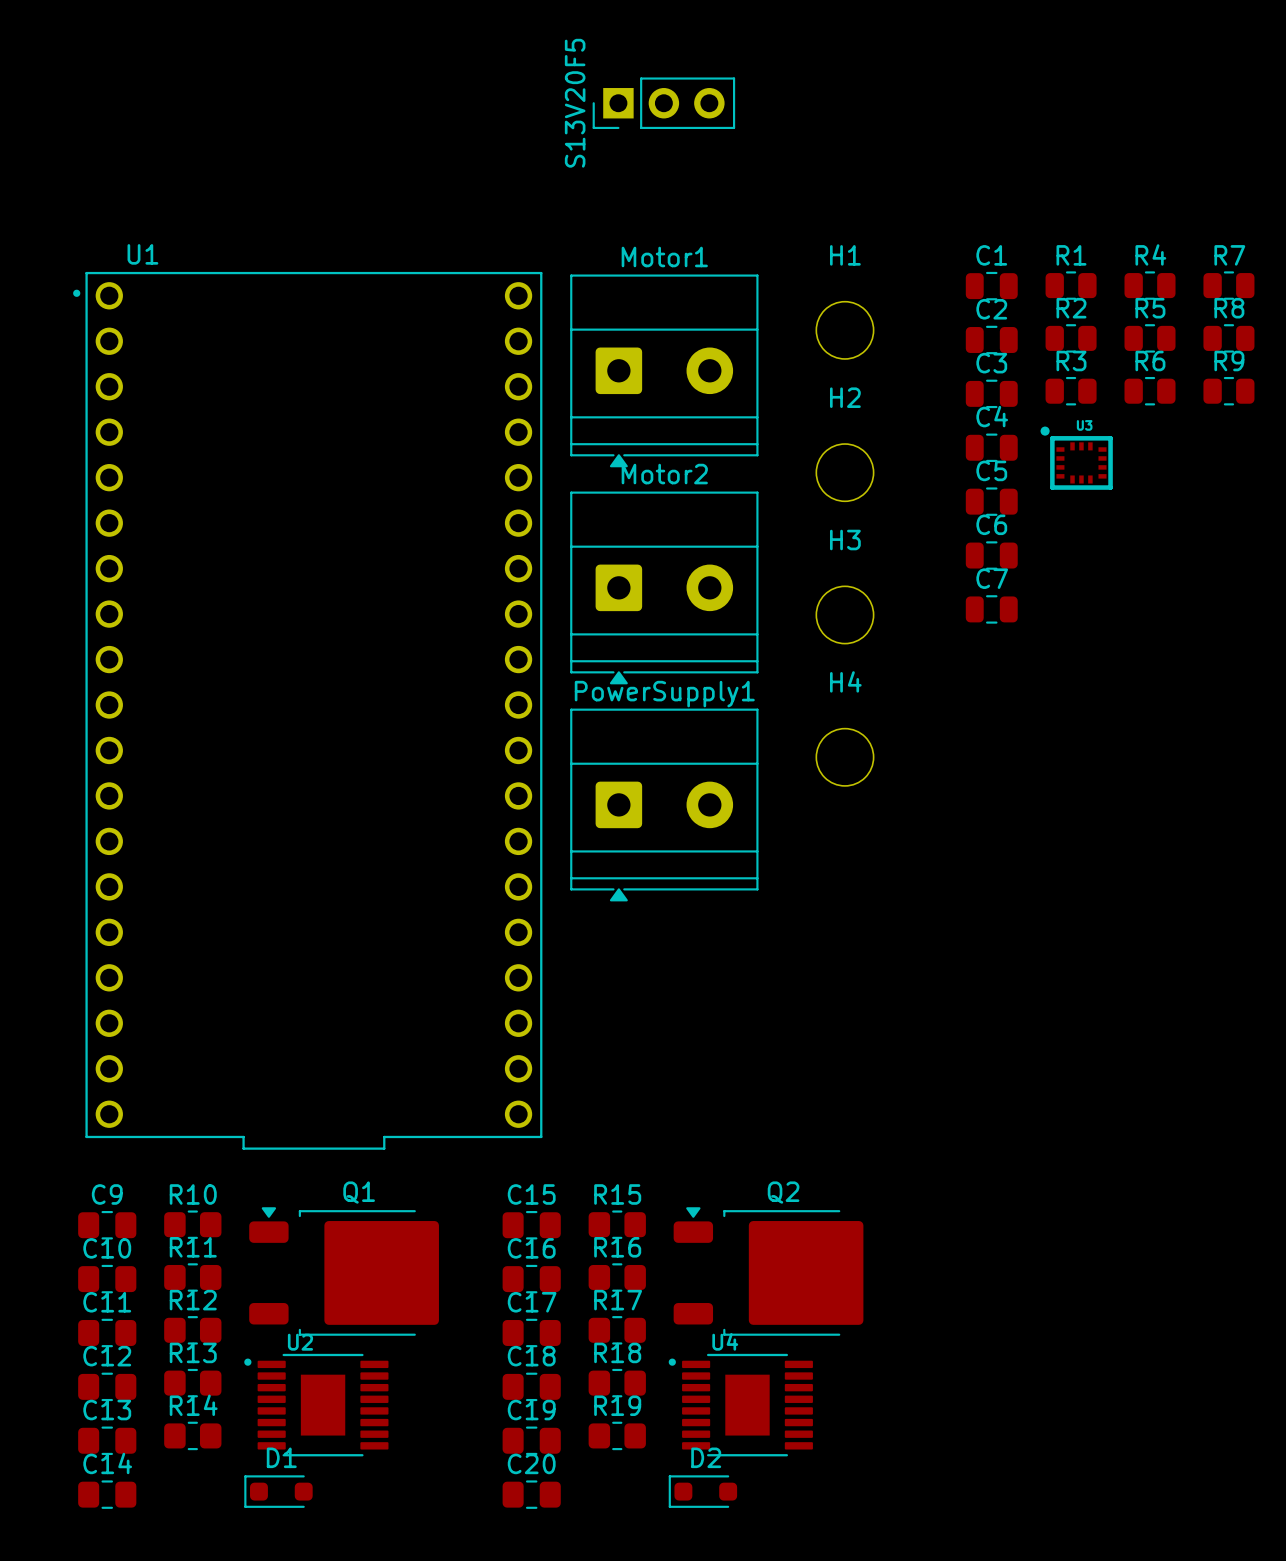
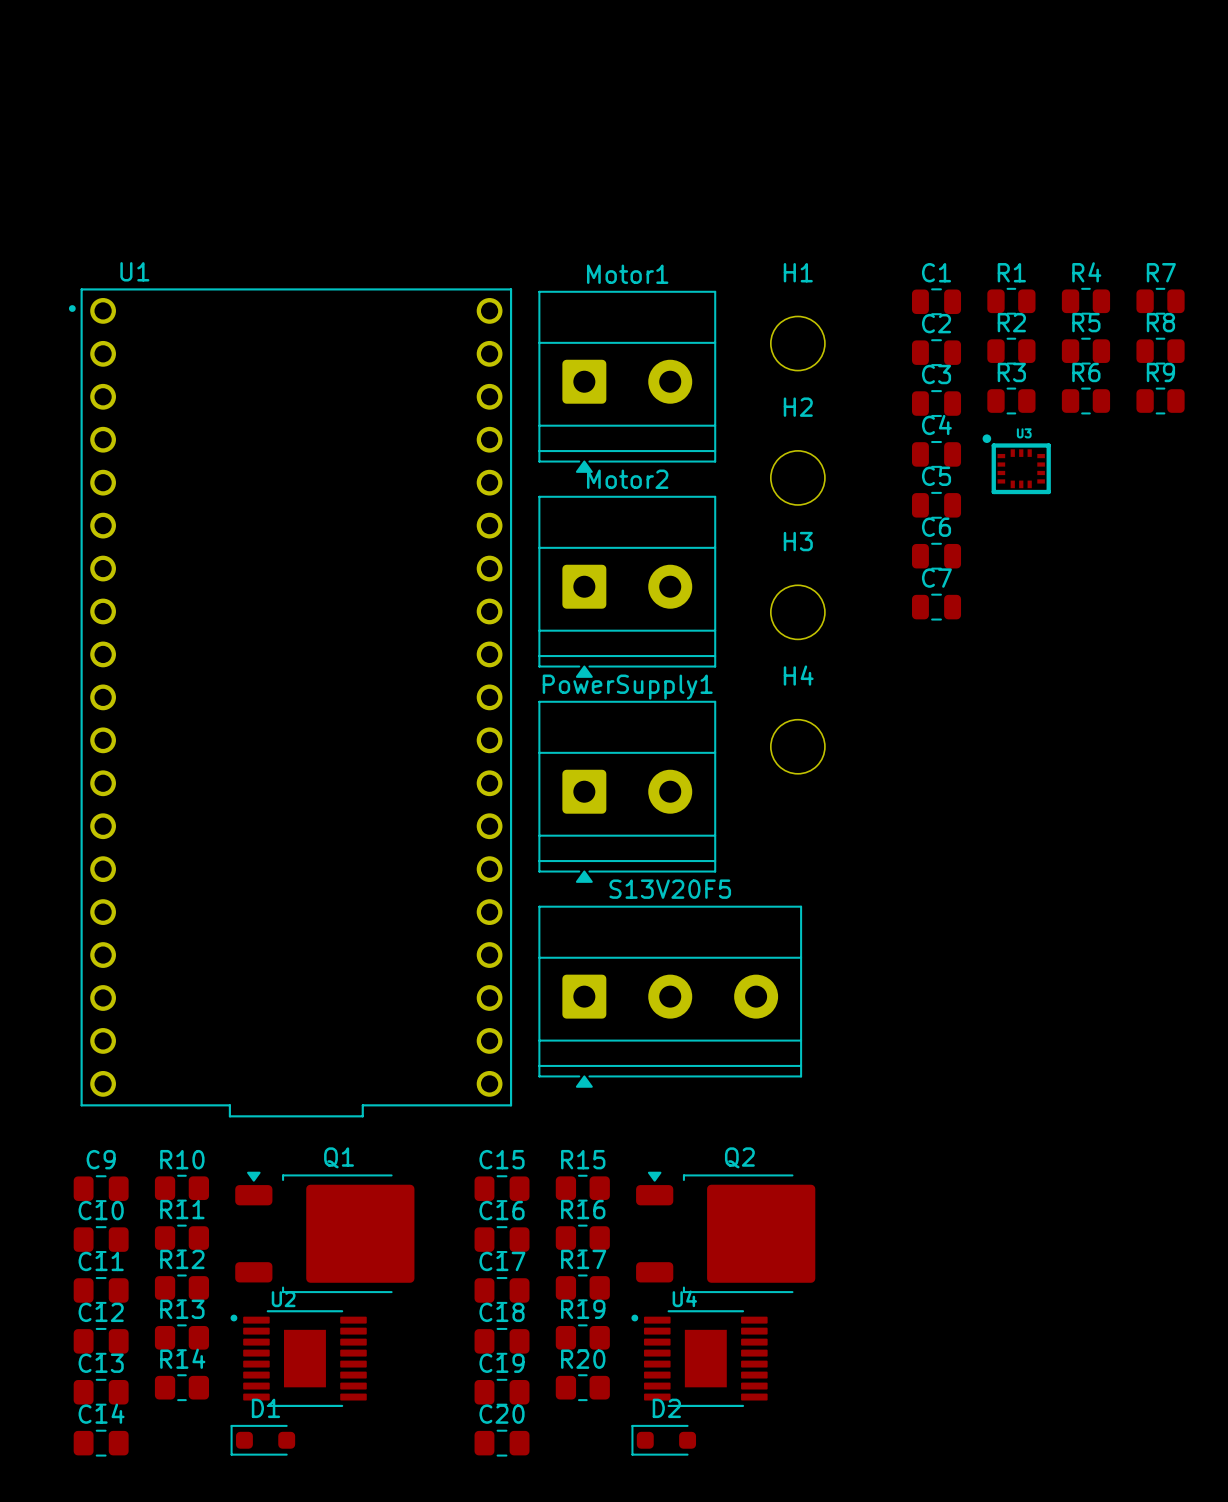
S13V20F5 footprint: [592, 77, 736, 130] -> [538, 905, 803, 1088]
S13V20F5 name position: S13V20F5 (575, 103) -> S13V20F5 (670, 889)
R18 name: R18 (617, 1352) -> R19 (583, 1309)
R19 name: R19 (617, 1405) -> R20 (583, 1359)

